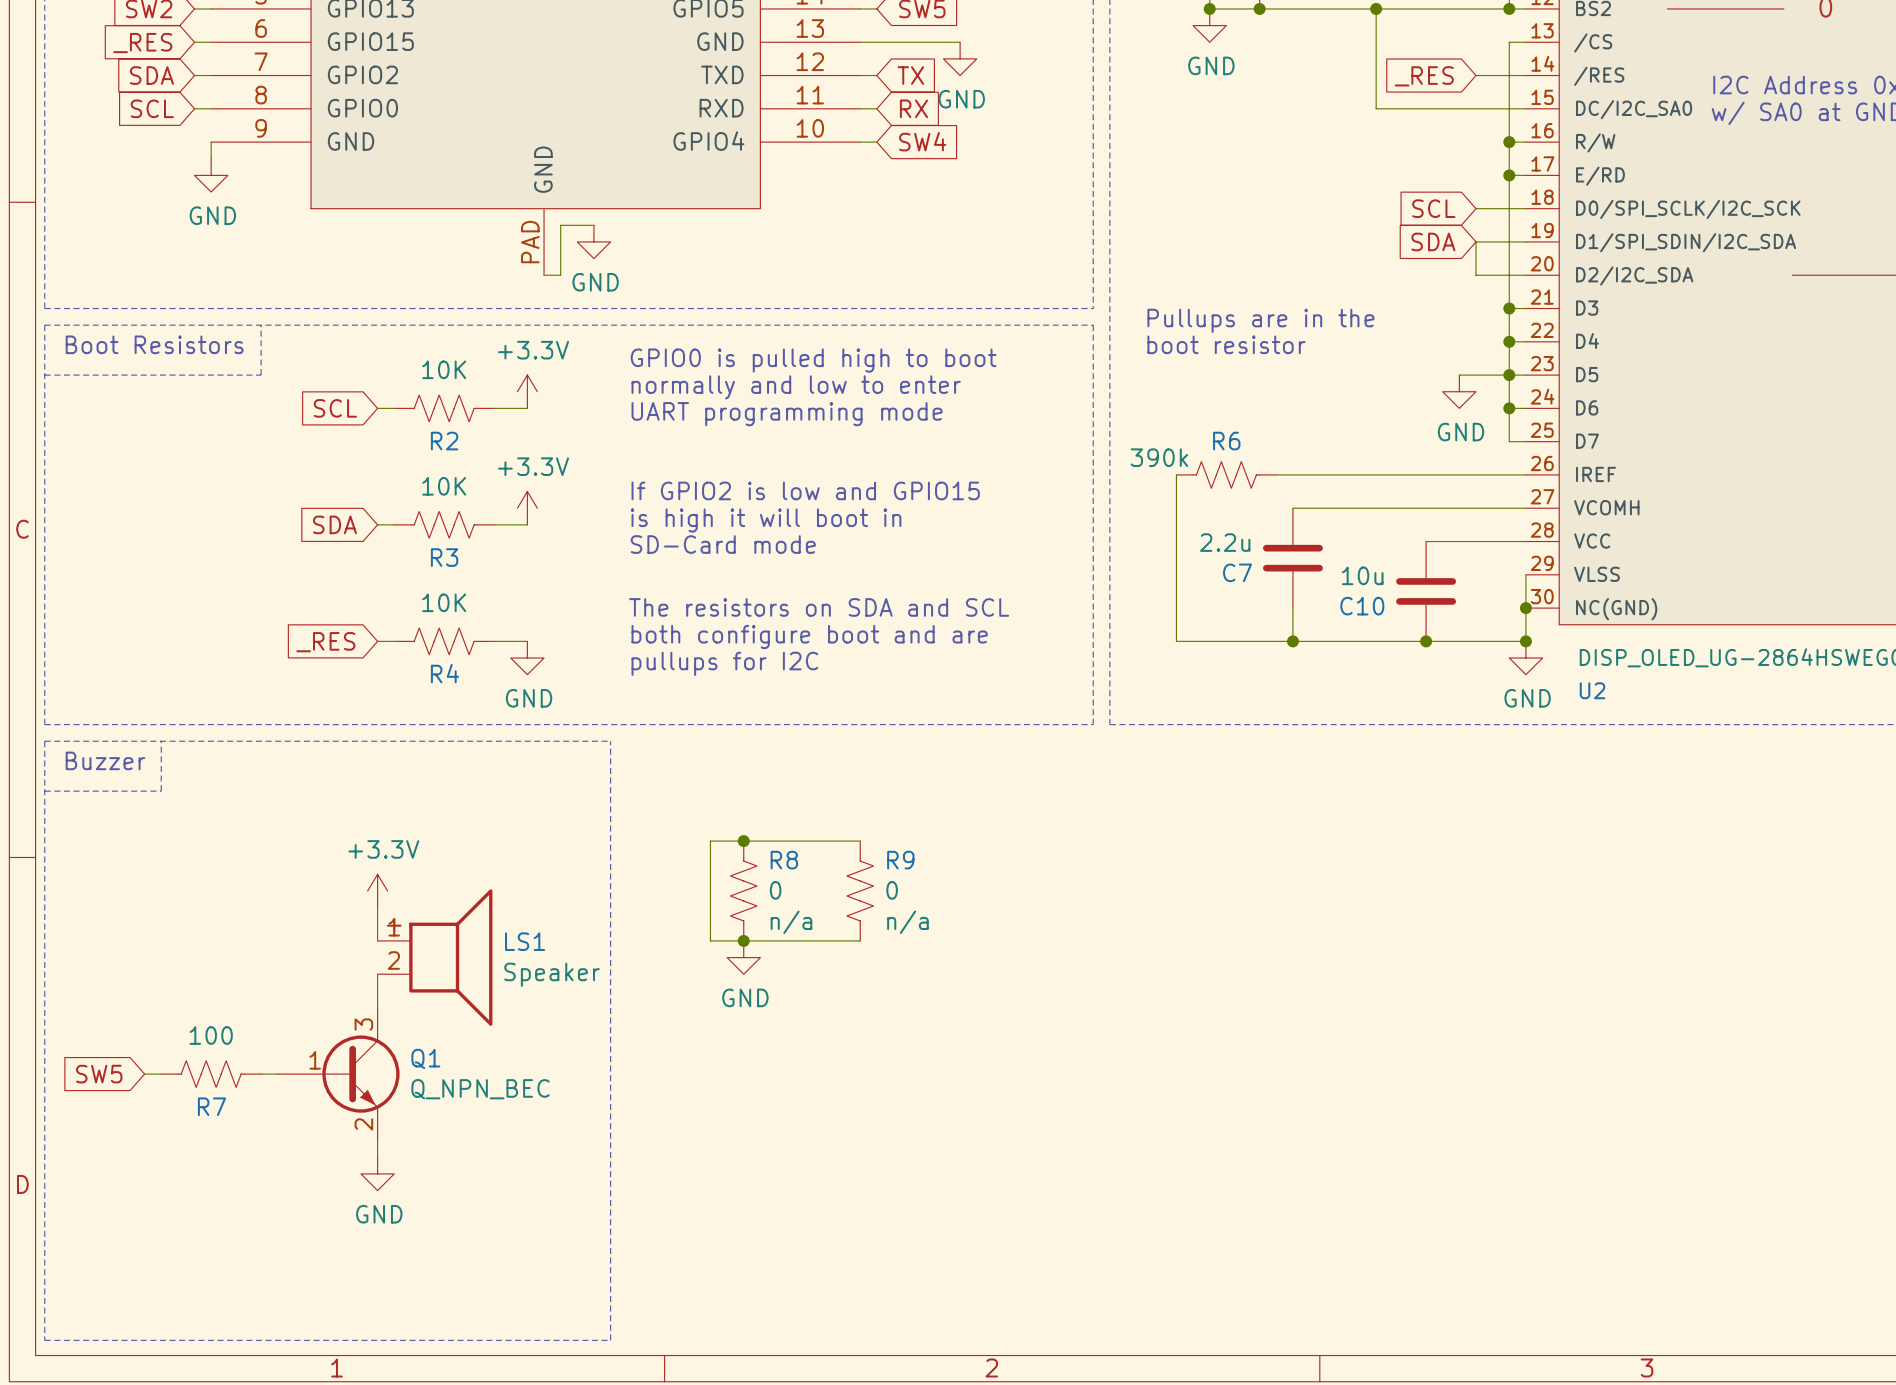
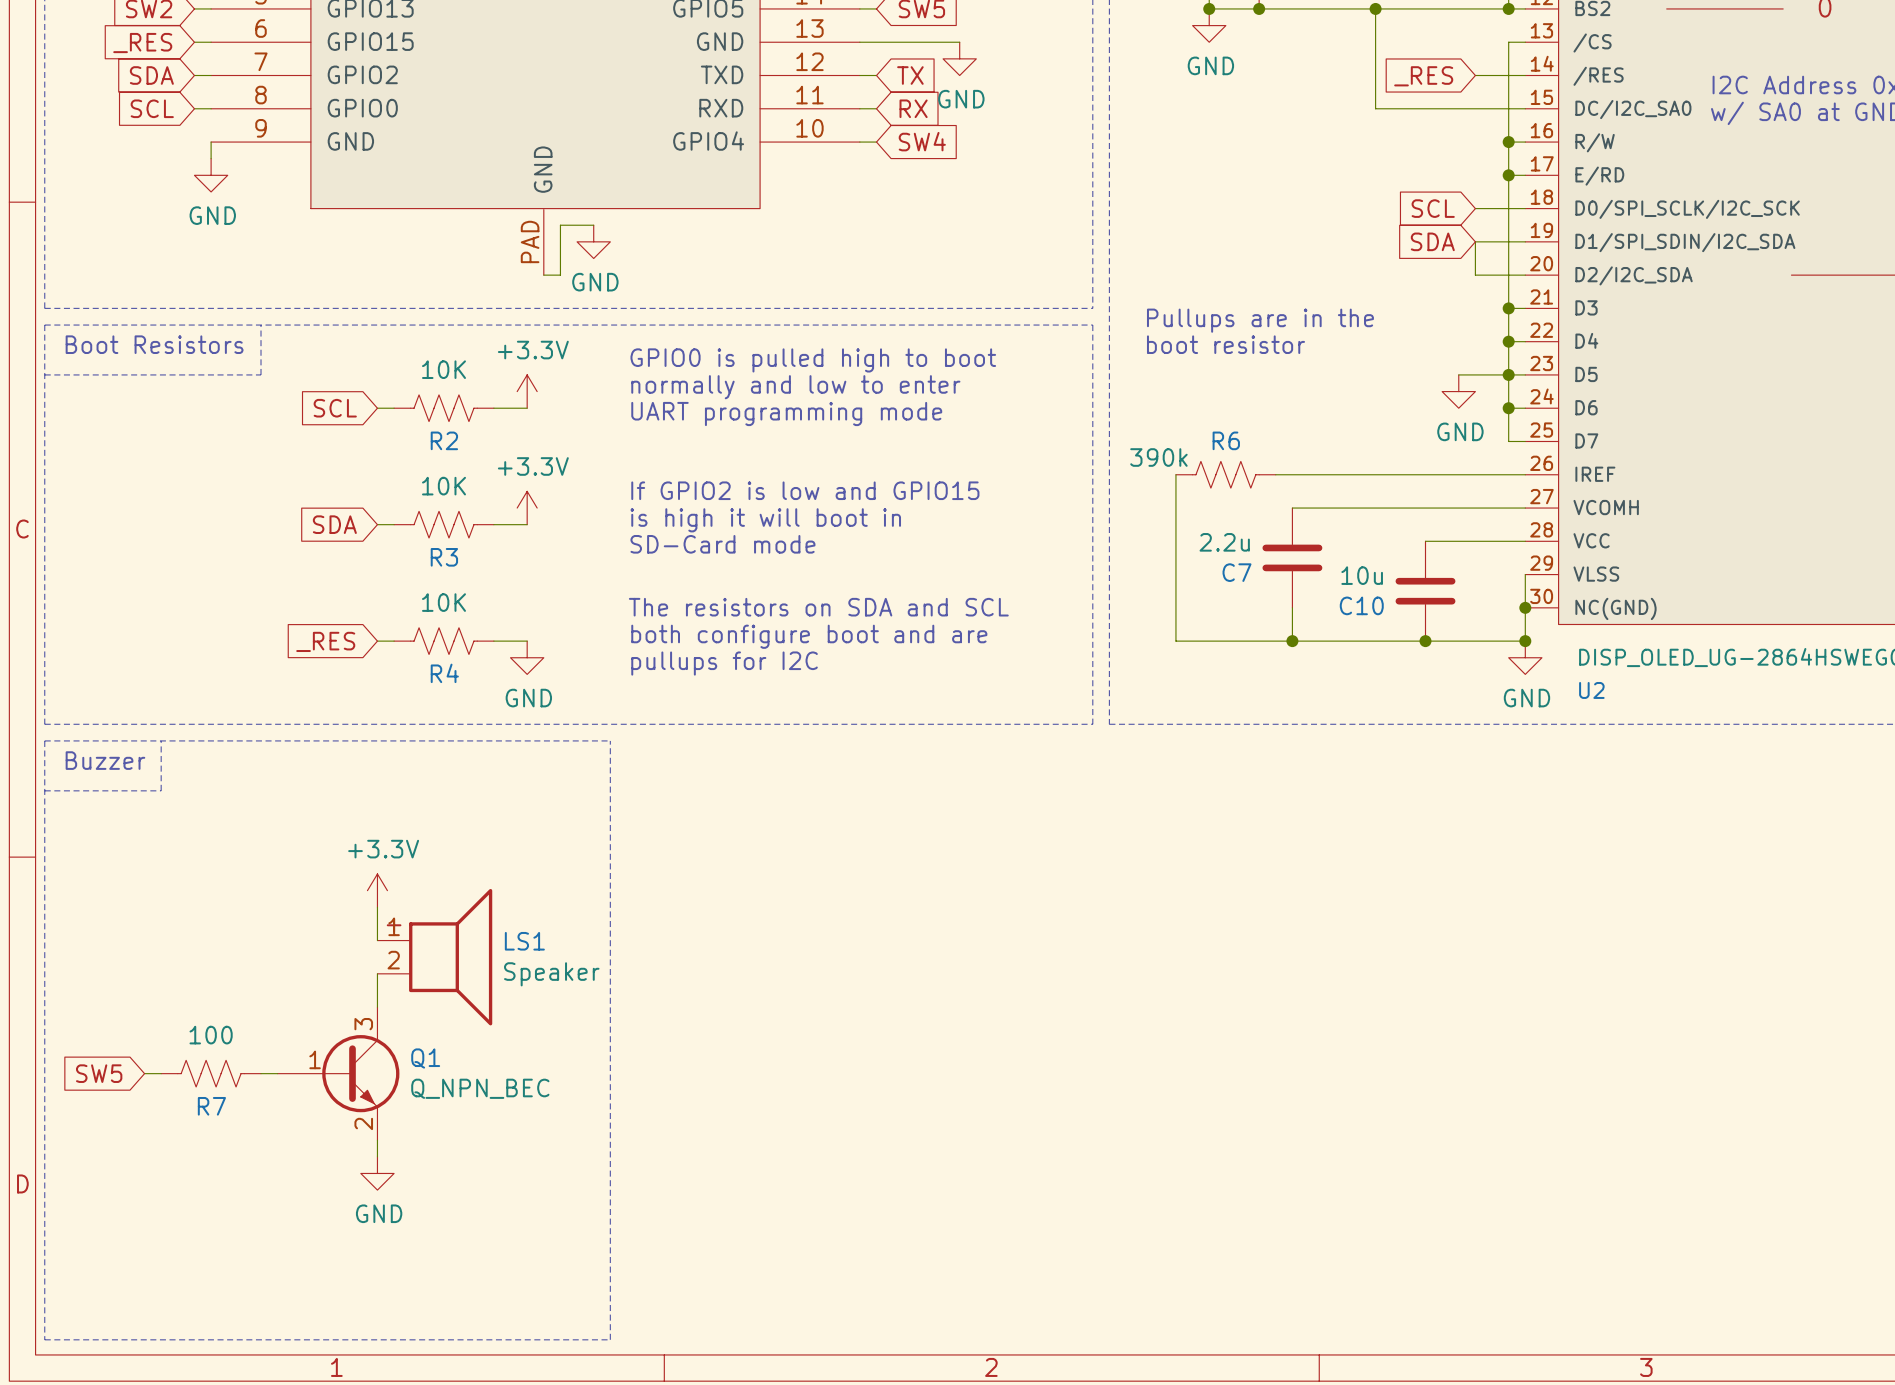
junction: (743, 841) -> none
wire: (860, 841) (710, 841) (710, 940) (860, 940) -> none
R8: 0 (743, 891) -> none
R9: 0 (860, 891) -> none
junction: (743, 940) -> none
power symbol: GND (743, 957) -> none

